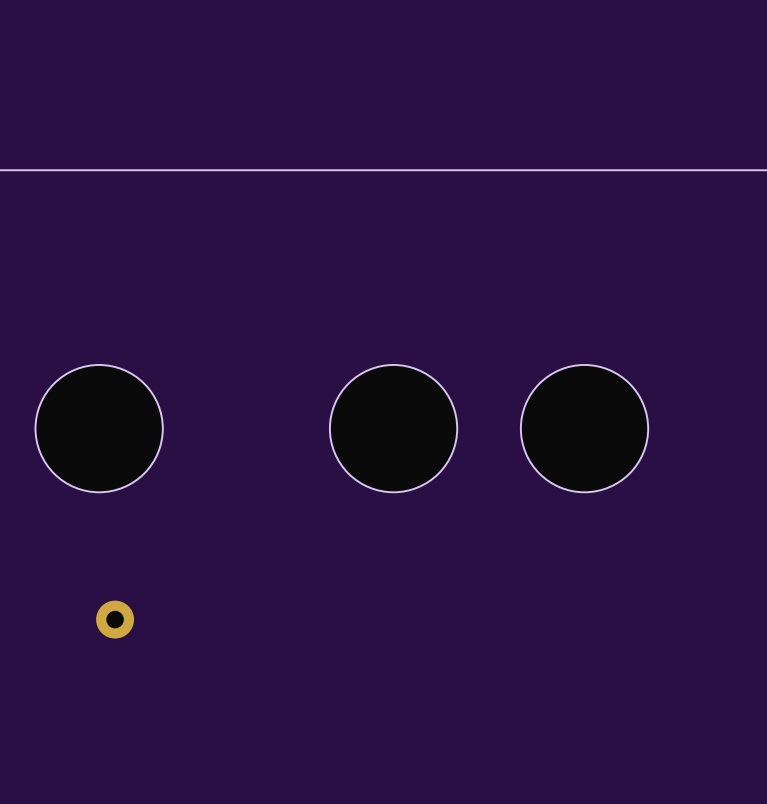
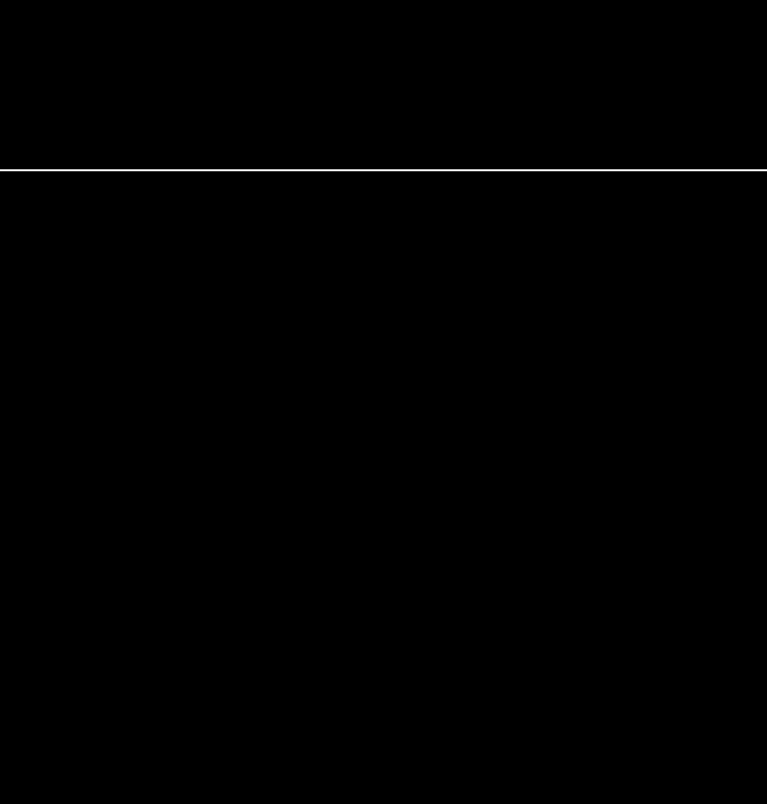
hole: (99, 428) -> none
hole: (393, 428) -> none
hole: (584, 428) -> none
via: (115, 619) -> none

